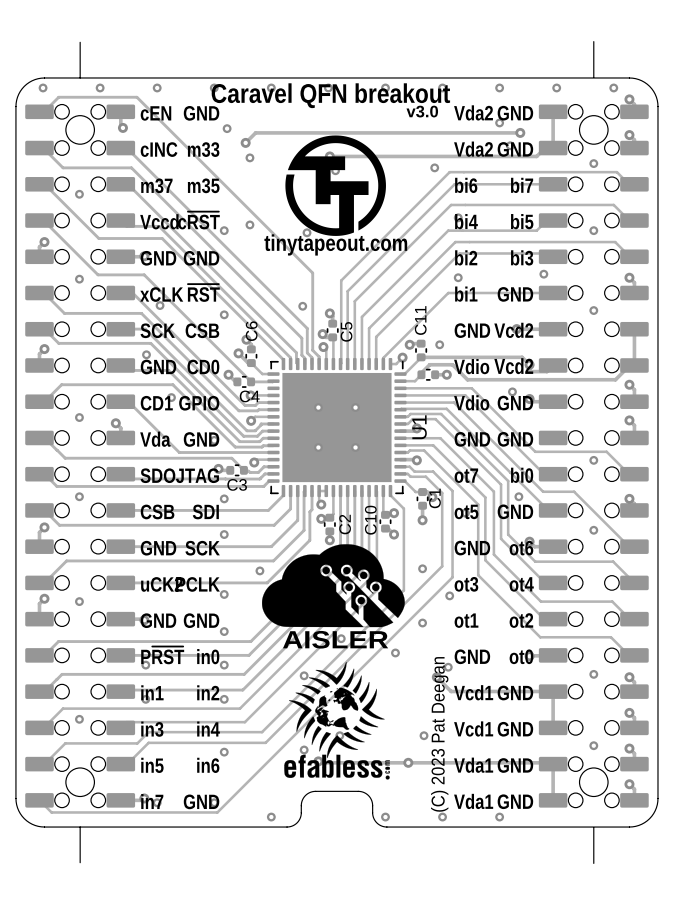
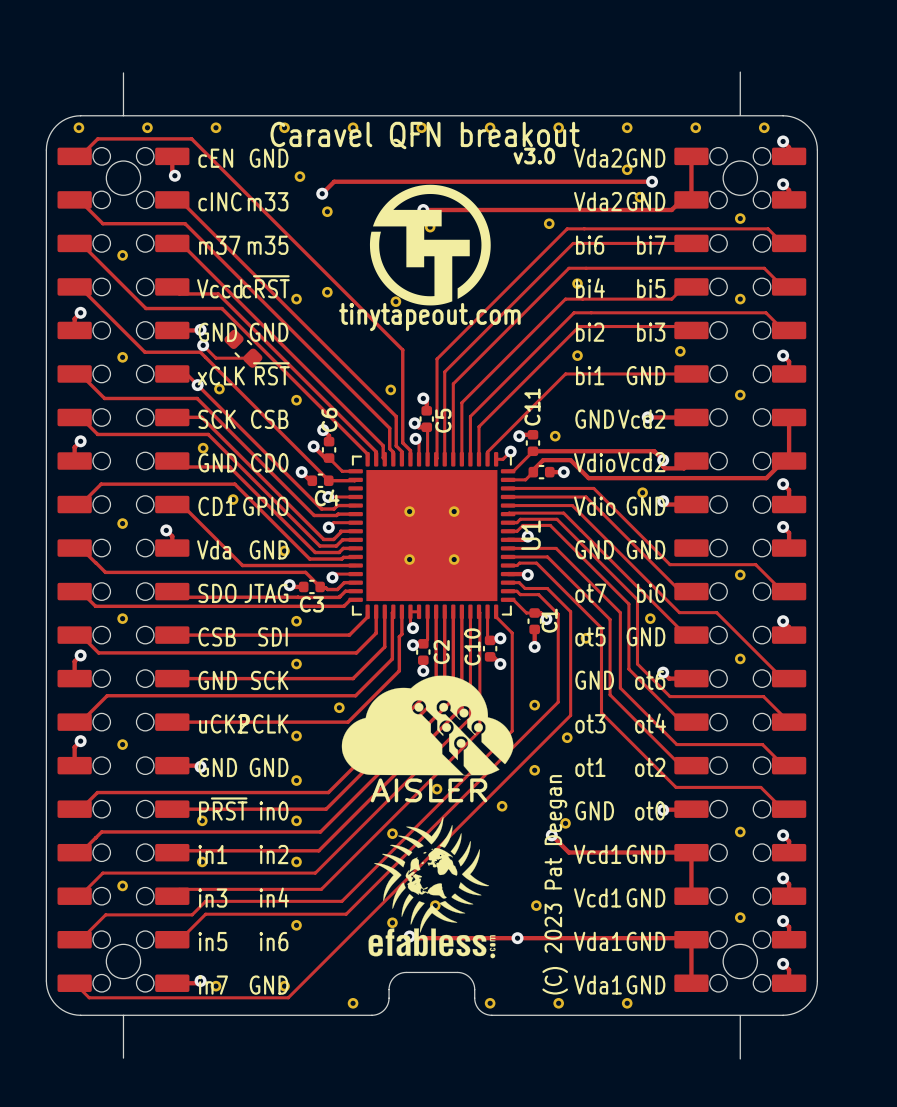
track: none -> (203, 345) (215, 358) (252, 358)
via: none -> (203, 345)
part: none -> (243, 348)
via: none -> (197, 385)

